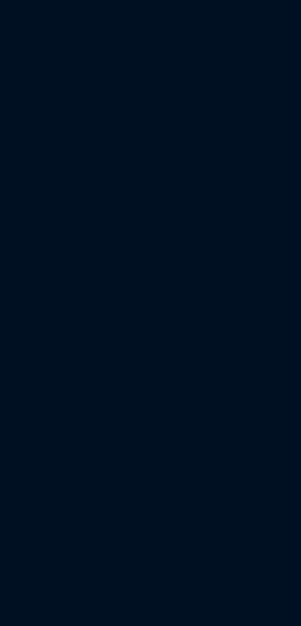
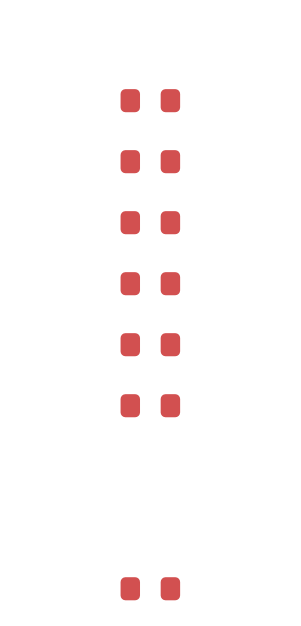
part: none -> (150, 100)
part: none -> (150, 161)
part: none -> (150, 222)
part: none -> (150, 283)
part: none -> (150, 344)
part: none -> (150, 405)
part: none -> (150, 588)

